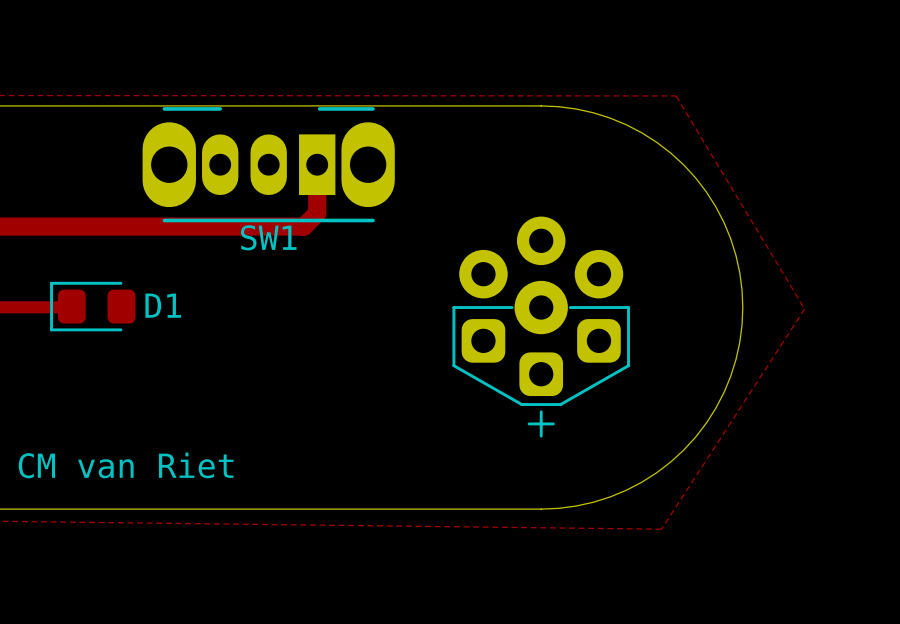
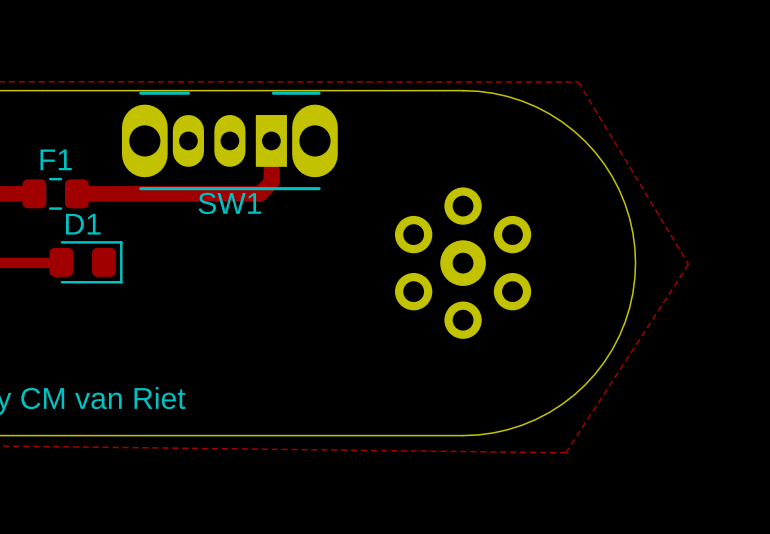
part footprint: [452, 216, 630, 438] -> [394, 187, 532, 339]
track: (40, 226) (89, 226) -> none
F1: none -> (55, 193)
D1 name position: D1 (163, 305) -> D1 (83, 224)
D1 rotation: 0° (92, 306) -> 180° (86, 262)

